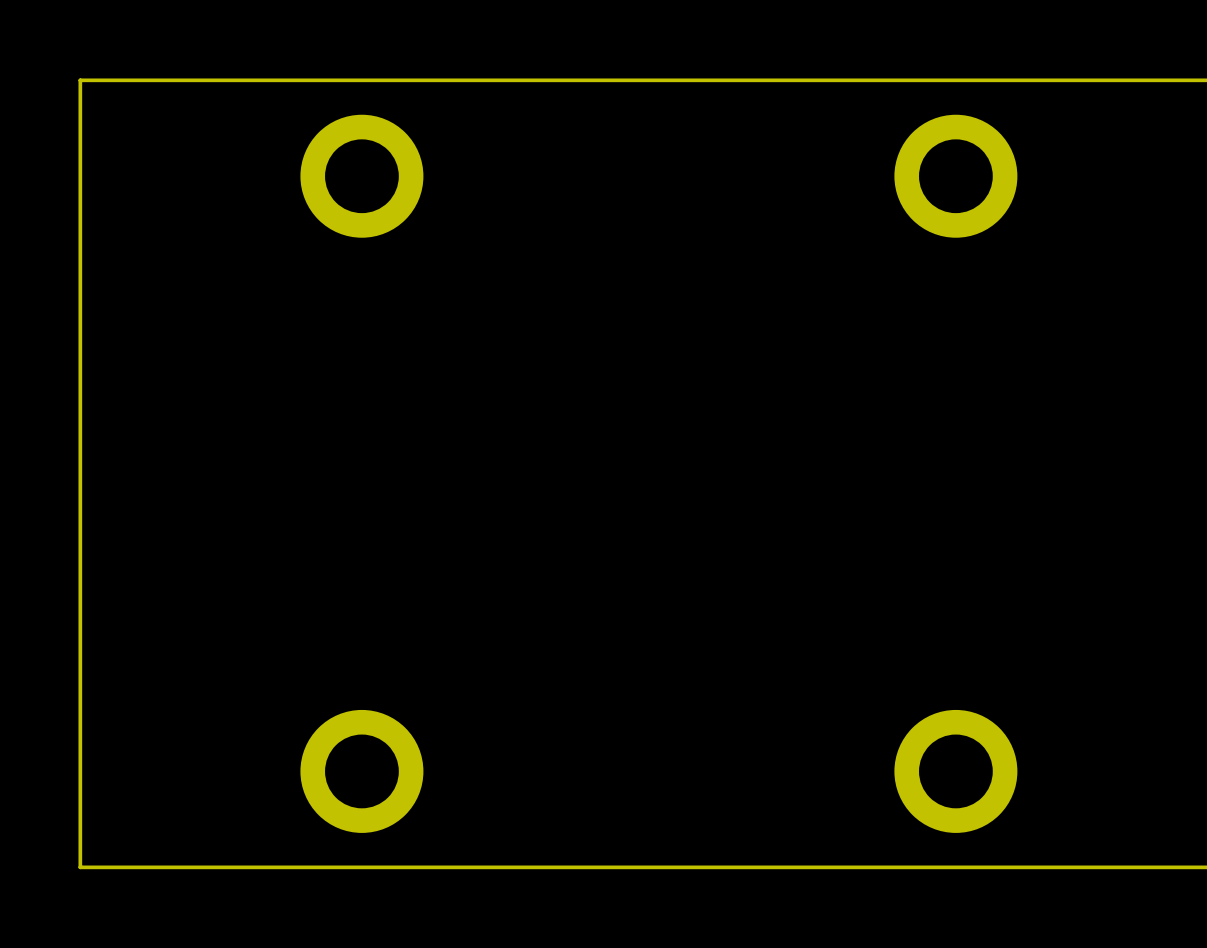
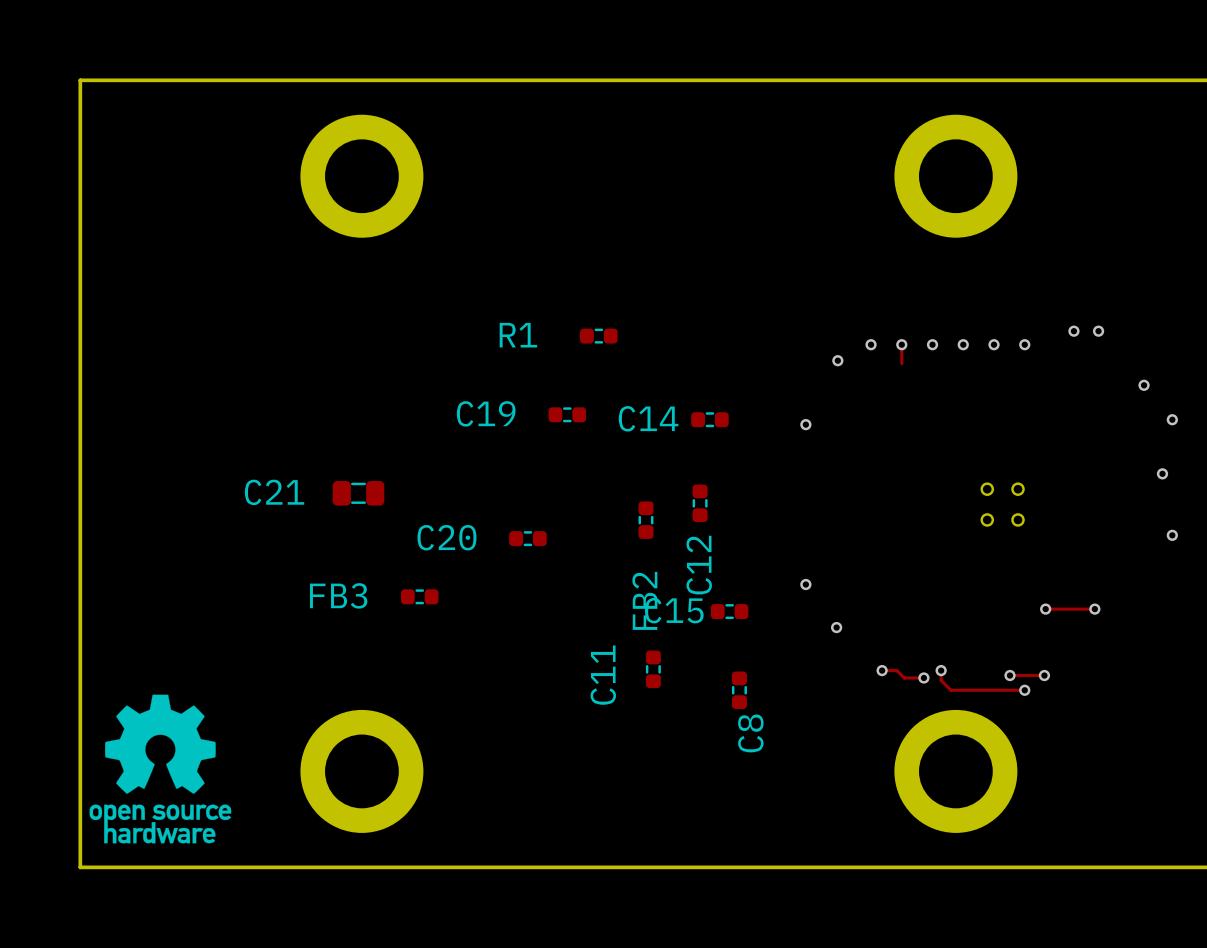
via: none -> (1073, 331)
via: none -> (1098, 331)
R1: none -> (598, 336)
via: none -> (871, 344)
track: none -> (901, 344) (901, 363)
via: none -> (901, 344)
via: none -> (932, 344)
via: none -> (963, 344)
via: none -> (994, 344)
via: none -> (1024, 344)
via: none -> (837, 360)
via: none -> (1144, 385)
C19: none -> (567, 414)
C14: none -> (709, 419)
via: none -> (1172, 419)
via: none -> (805, 424)
via: none -> (1162, 473)
C21: none -> (358, 493)
C12: none -> (700, 503)
part: none -> (1002, 504)
FB2: none -> (646, 520)
via: none -> (1172, 535)
C20: none -> (527, 538)
via: none -> (805, 584)
FB3: none -> (419, 596)
track: none -> (1045, 609) (1094, 609)
via: none -> (1045, 609)
via: none -> (1094, 609)
C15: none -> (729, 611)
via: none -> (836, 627)
C11: none -> (653, 669)
track: none -> (882, 670) (896, 670) (904, 677) (923, 677)
via: none -> (882, 670)
track: none -> (941, 670) (941, 680) (950, 690) (1024, 690)
via: none -> (941, 670)
track: none -> (1010, 675) (1044, 675)
via: none -> (1010, 675)
via: none -> (1044, 675)
via: none -> (923, 677)
C8: none -> (739, 690)
via: none -> (1024, 690)
drawing: none -> [89, 694, 232, 844]

